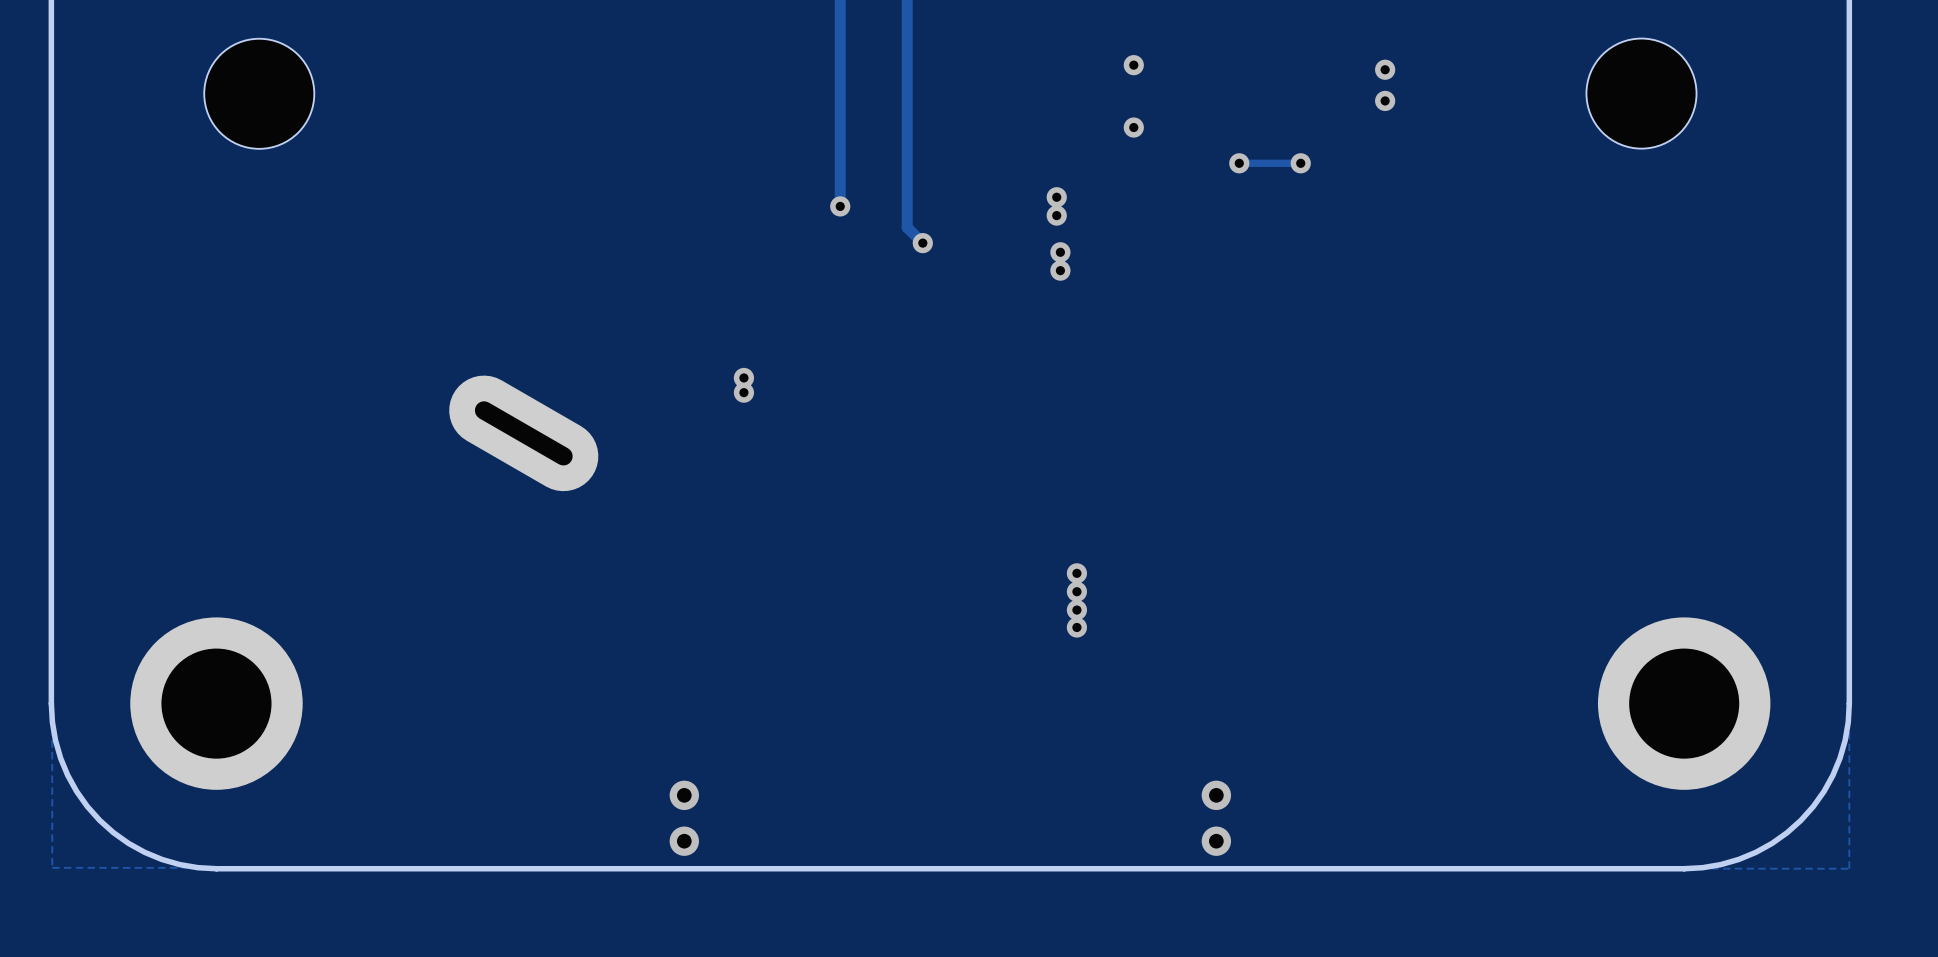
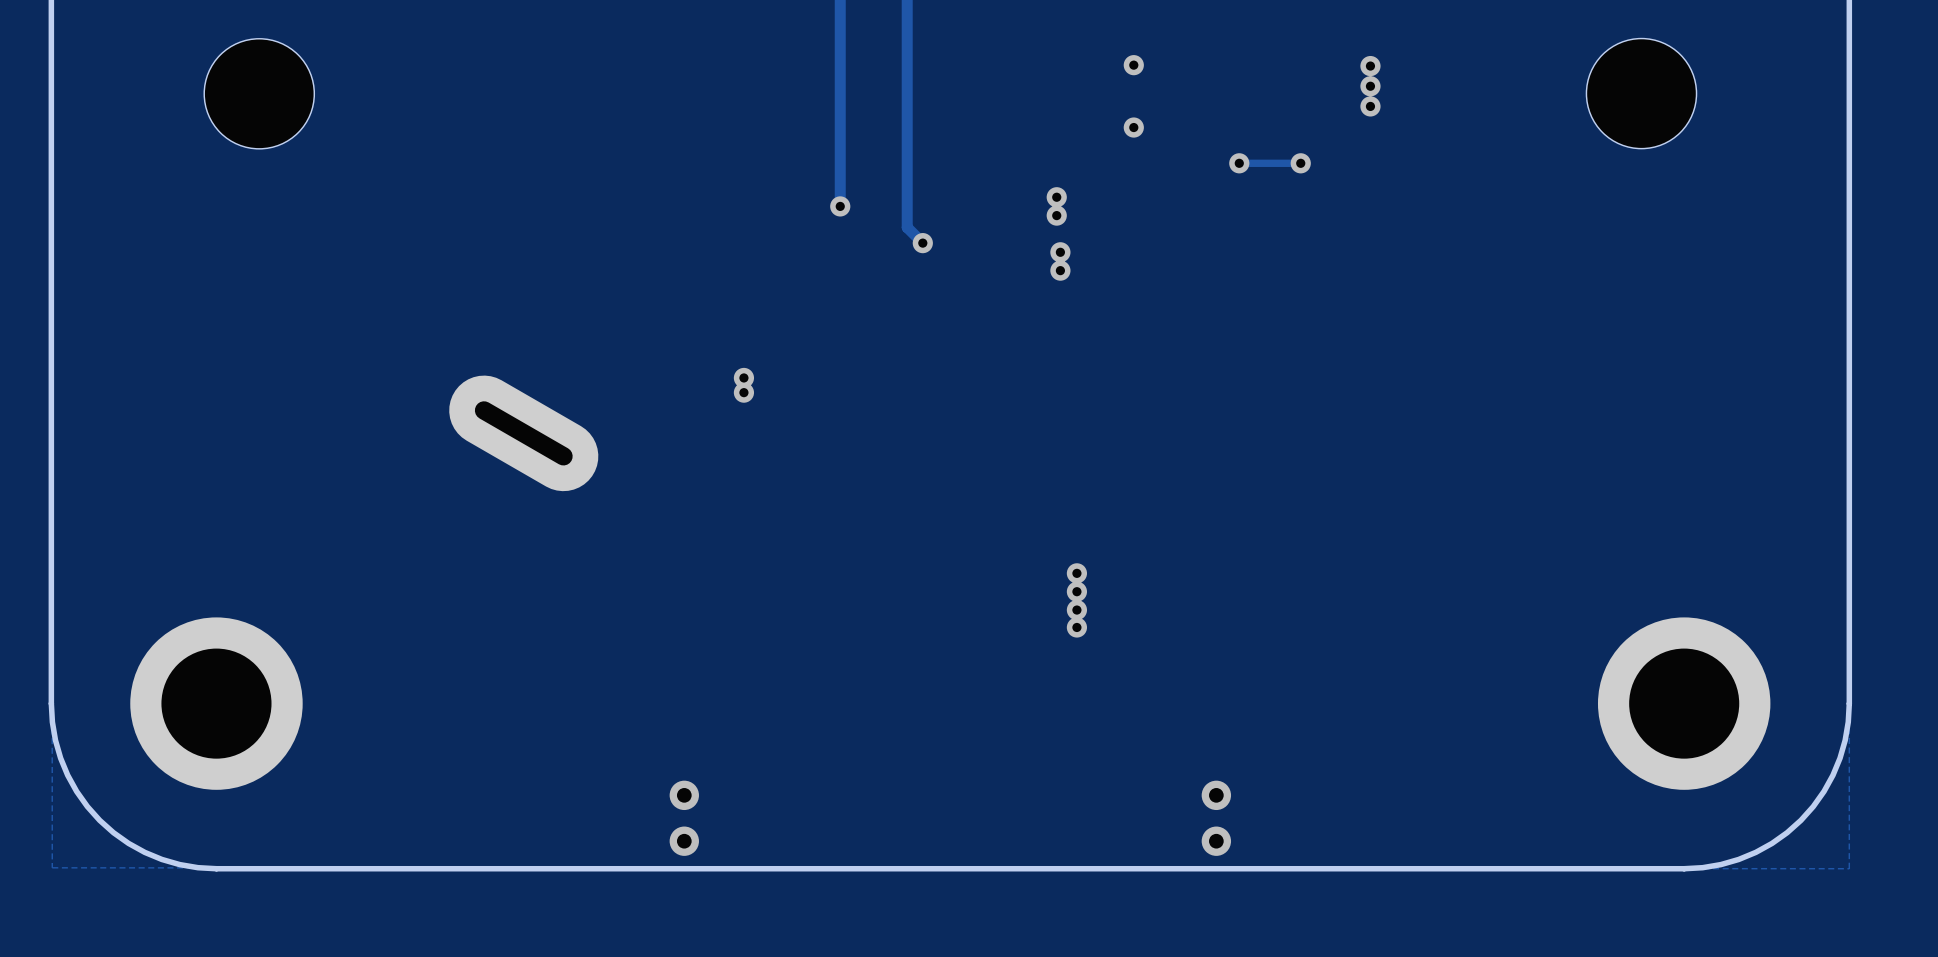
via: none -> (1370, 66)
via: (1385, 69) -> none
via: none -> (1370, 86)
via: (1385, 100) -> none
via: none -> (1370, 106)

